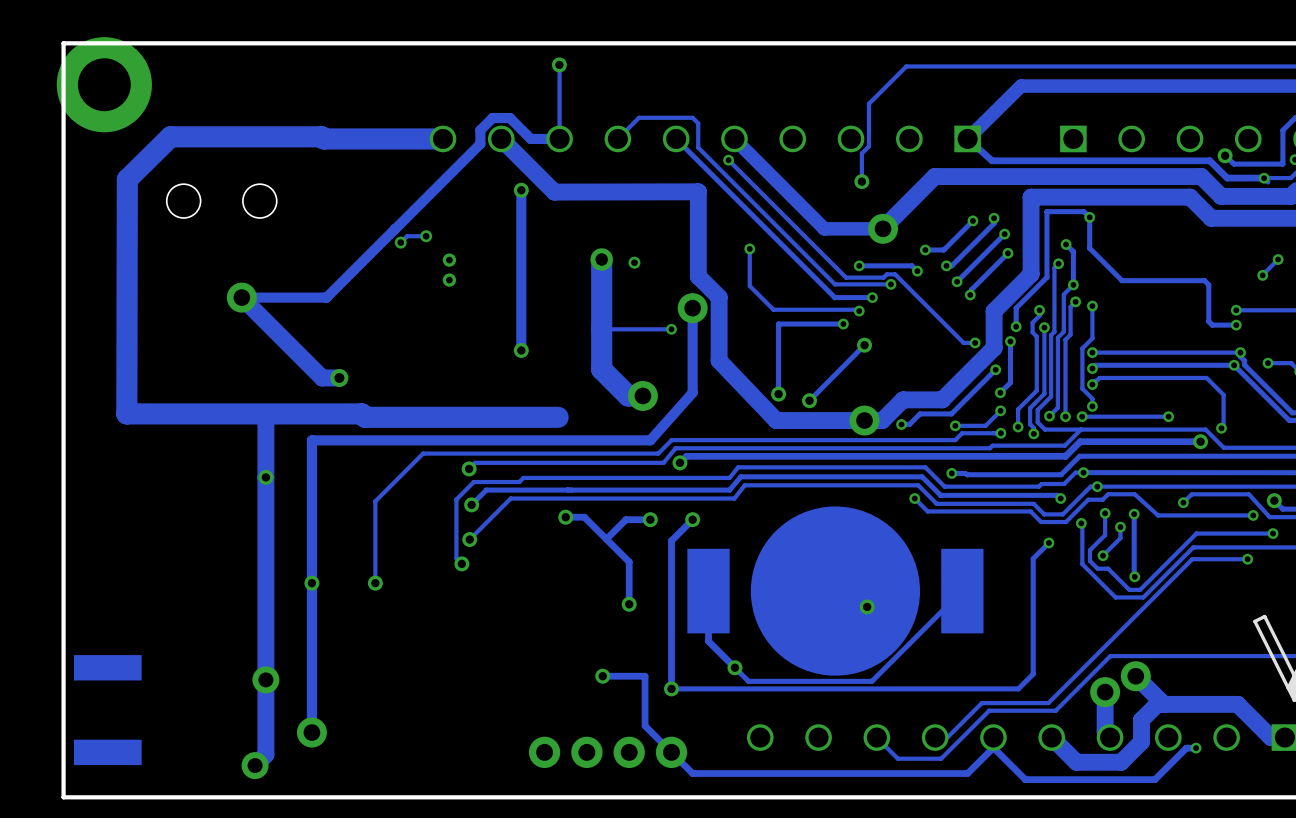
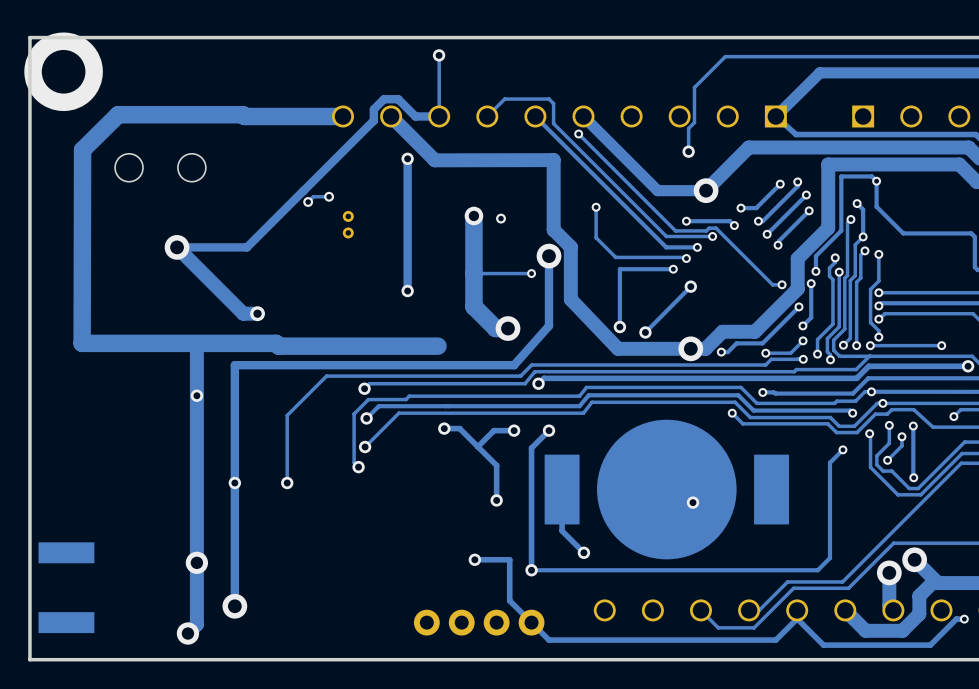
track: (962, 591) (871, 681) (748, 681) (734, 667) -> none

